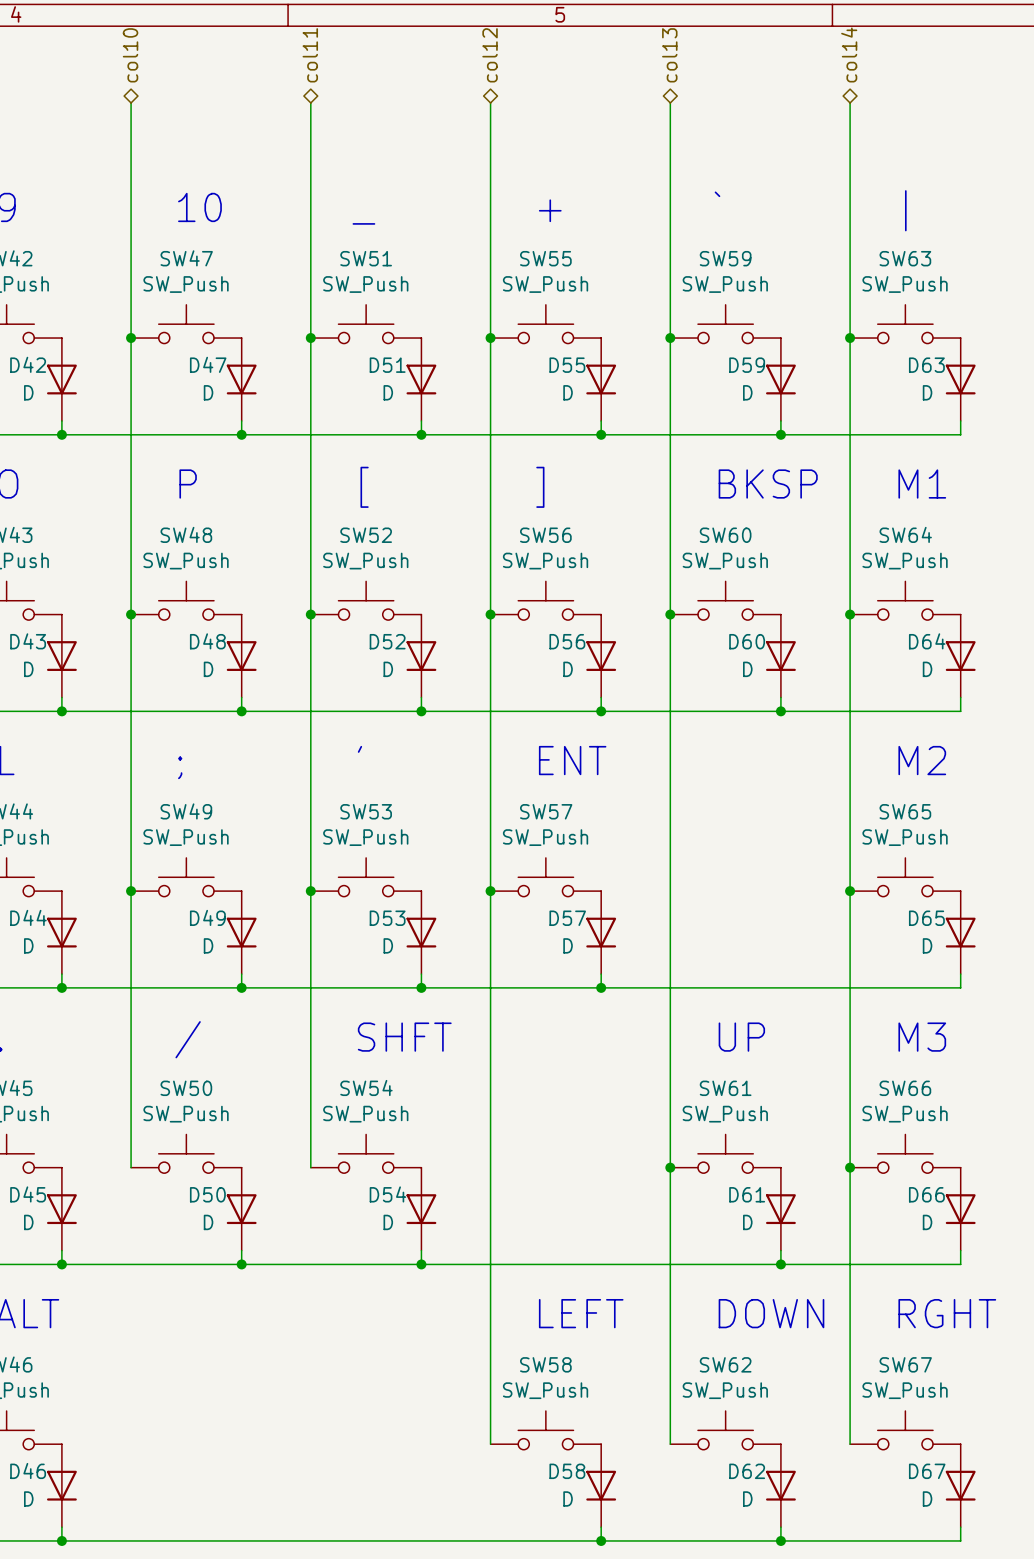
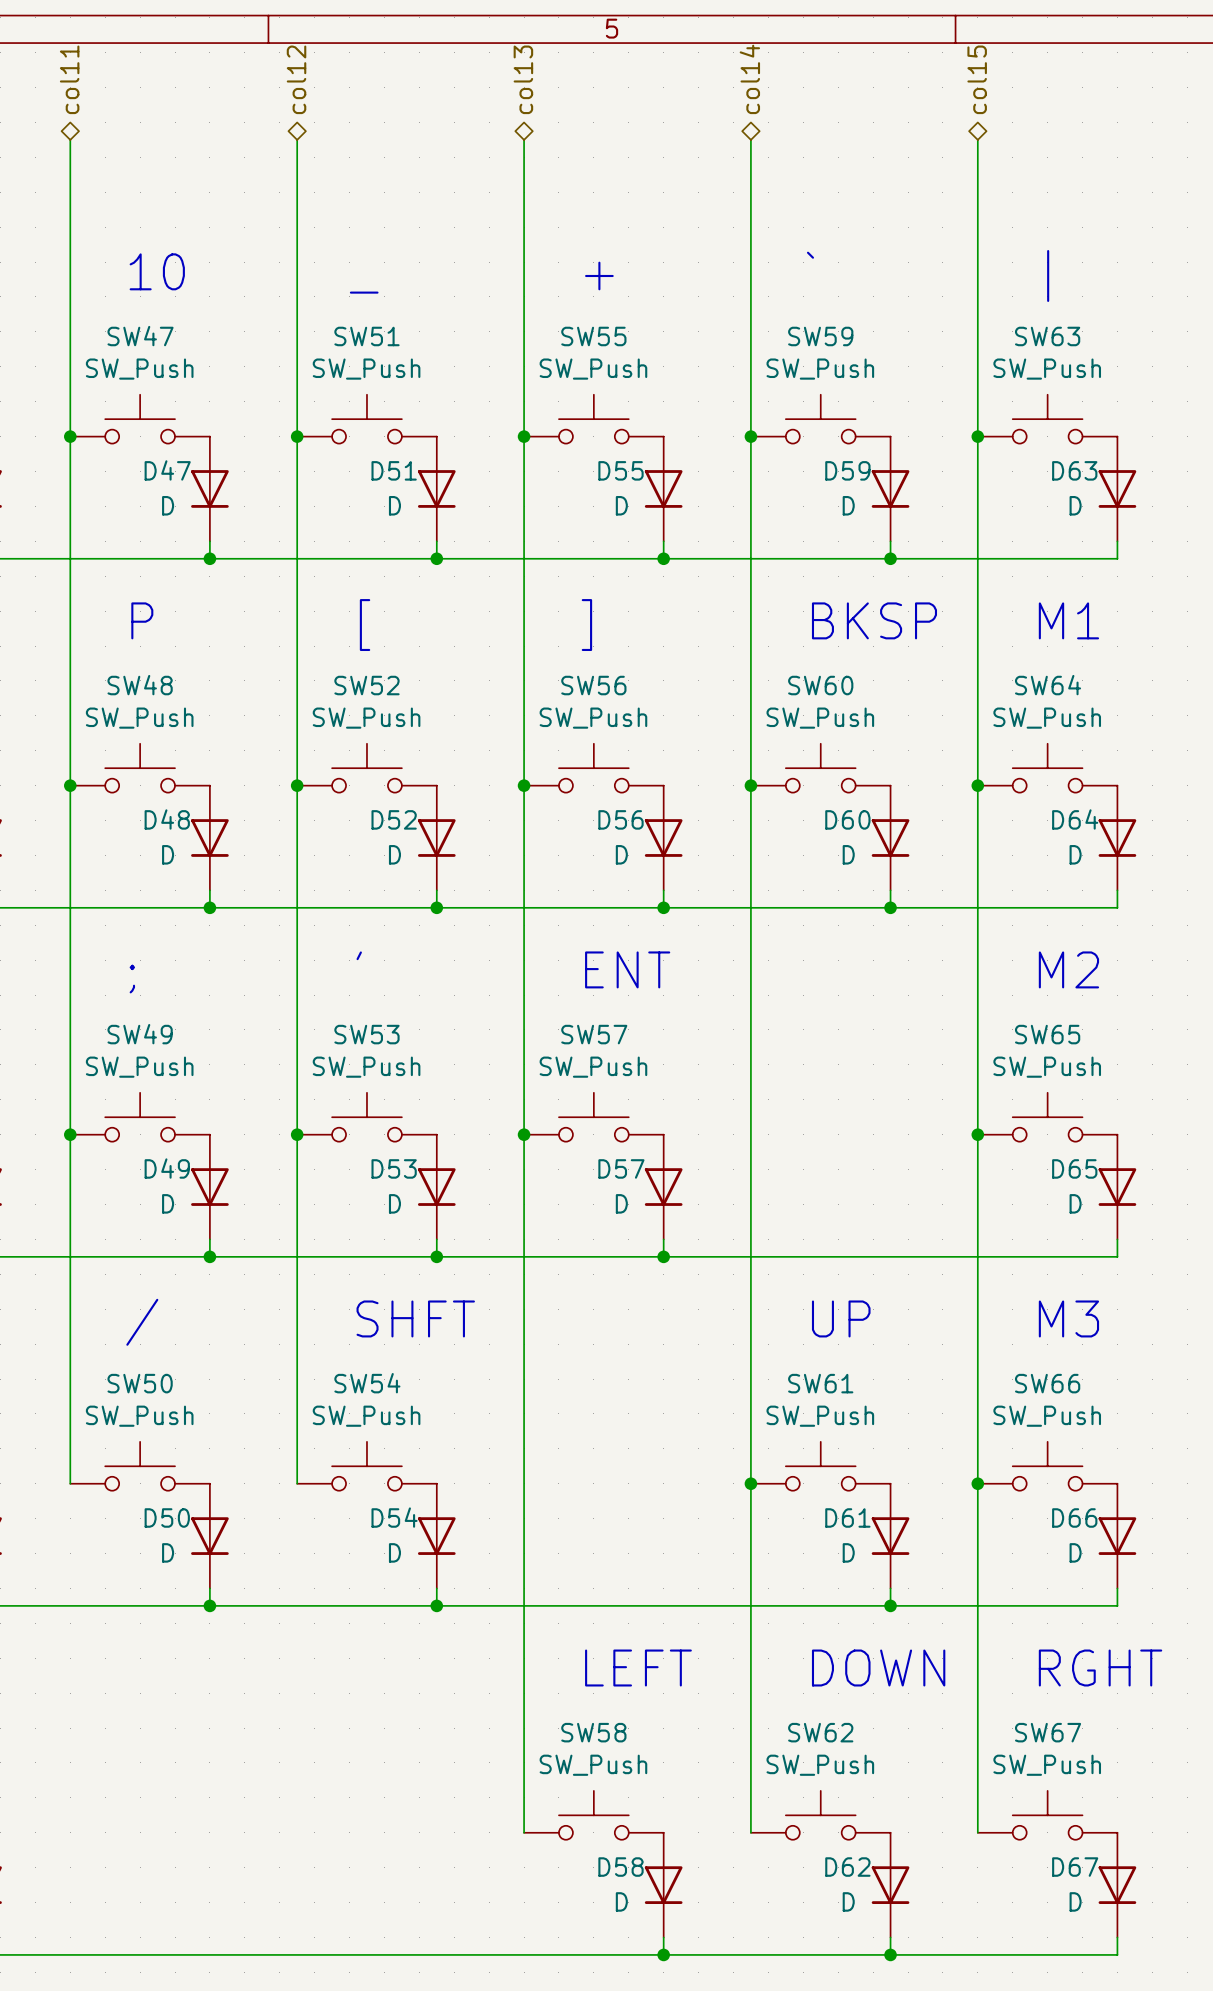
hierarchical label: col10 (130, 55) -> col11 (69, 79)
hierarchical label: col11 (310, 55) -> col12 (296, 79)
hierarchical label: col12 (490, 55) -> col13 (523, 79)
hierarchical label: col13 (669, 55) -> col14 (749, 79)
hierarchical label: col14 (849, 55) -> col15 (977, 79)

